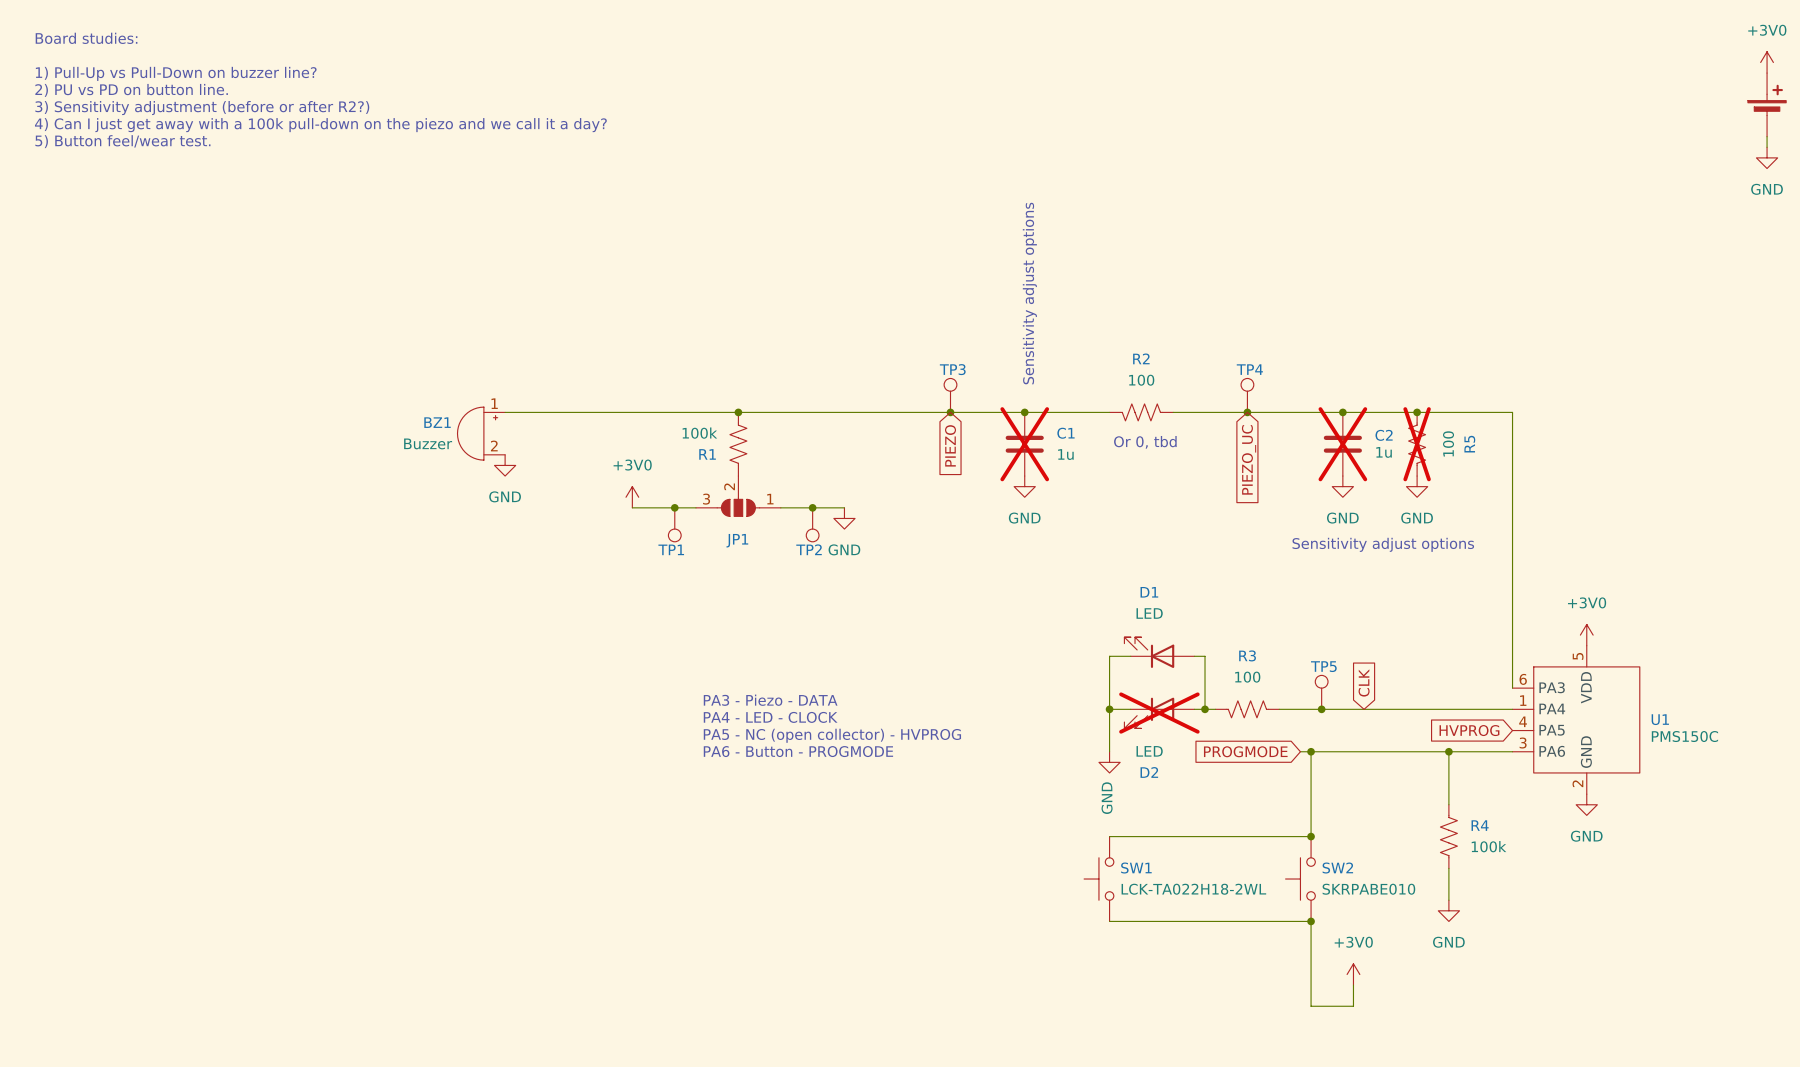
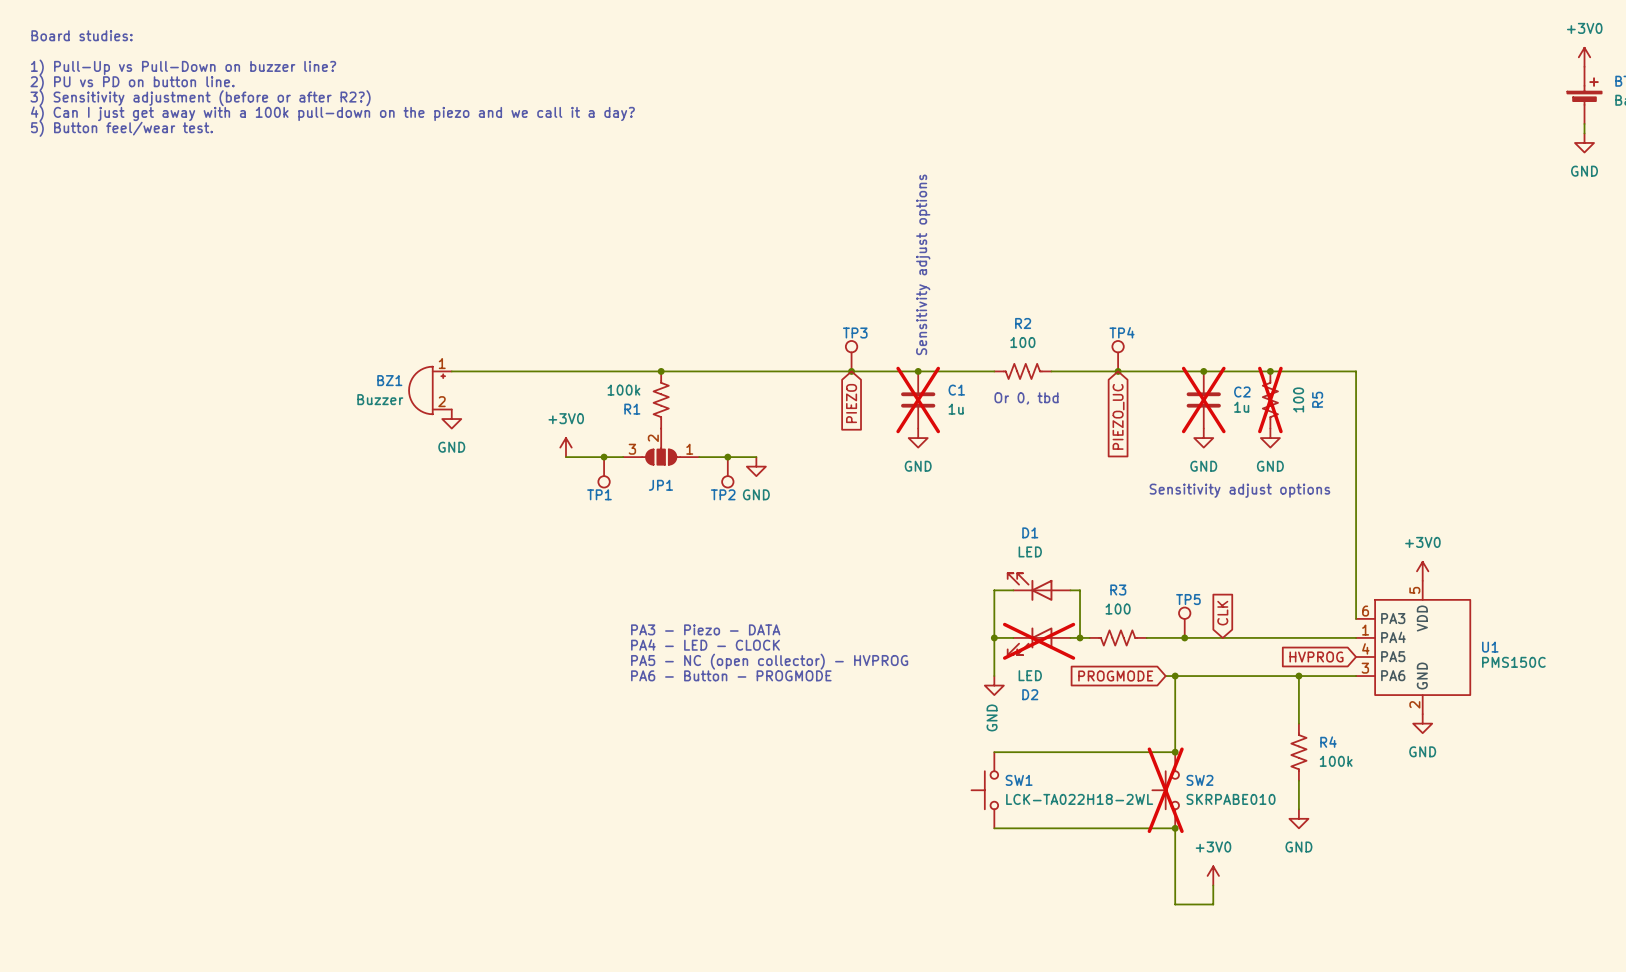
SW2 do-not-place cross: none -> (1165, 790)

